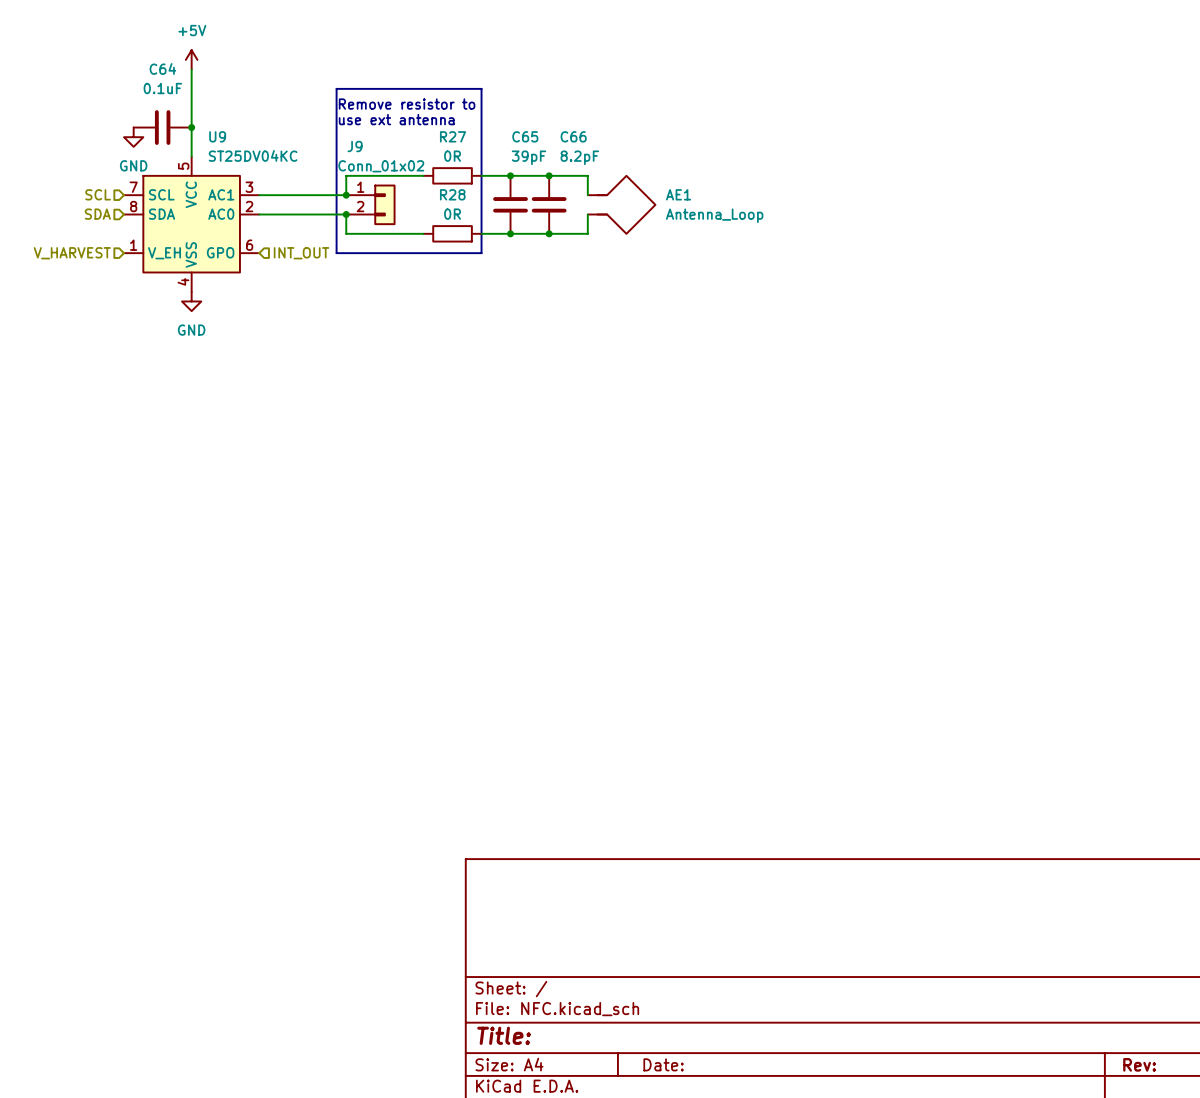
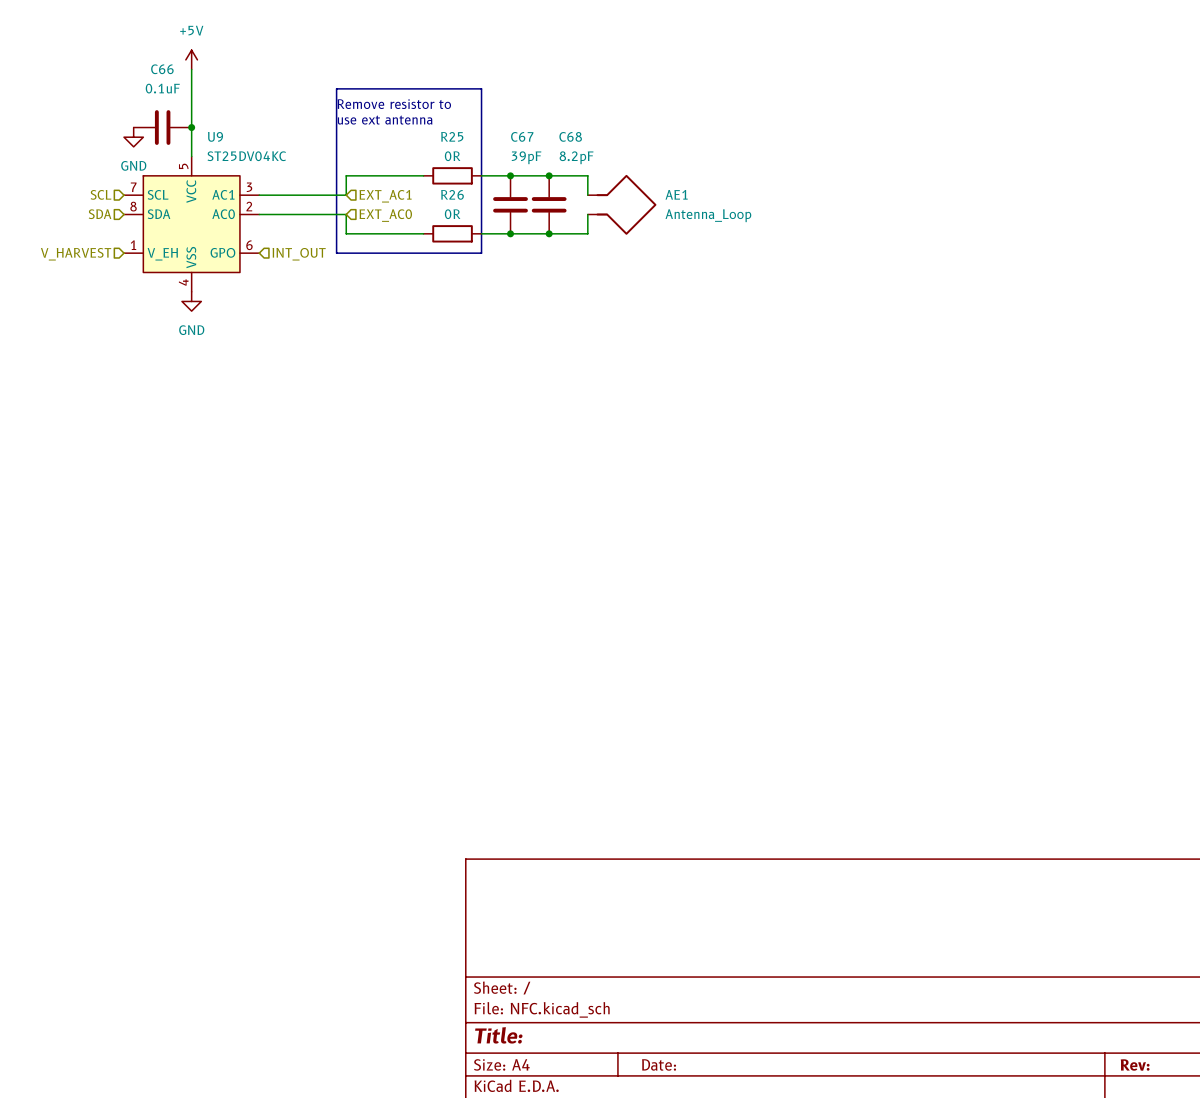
C64 name: C64 (162, 68) -> C66 (162, 69)
R27 name: R27 (453, 136) -> R25 (452, 136)
C65 name: C65 (525, 136) -> C67 (522, 136)
C66 name: C66 (573, 136) -> C68 (570, 136)
R28 name: R28 (452, 194) -> R26 (452, 194)
junction: (346, 195) -> none
hierarchical label: none -> EXT_AC1 (385, 196)
J9: Conn_01x02 (370, 204) -> none
junction: (346, 214) -> none
hierarchical label: none -> EXT_AC0 (385, 215)

